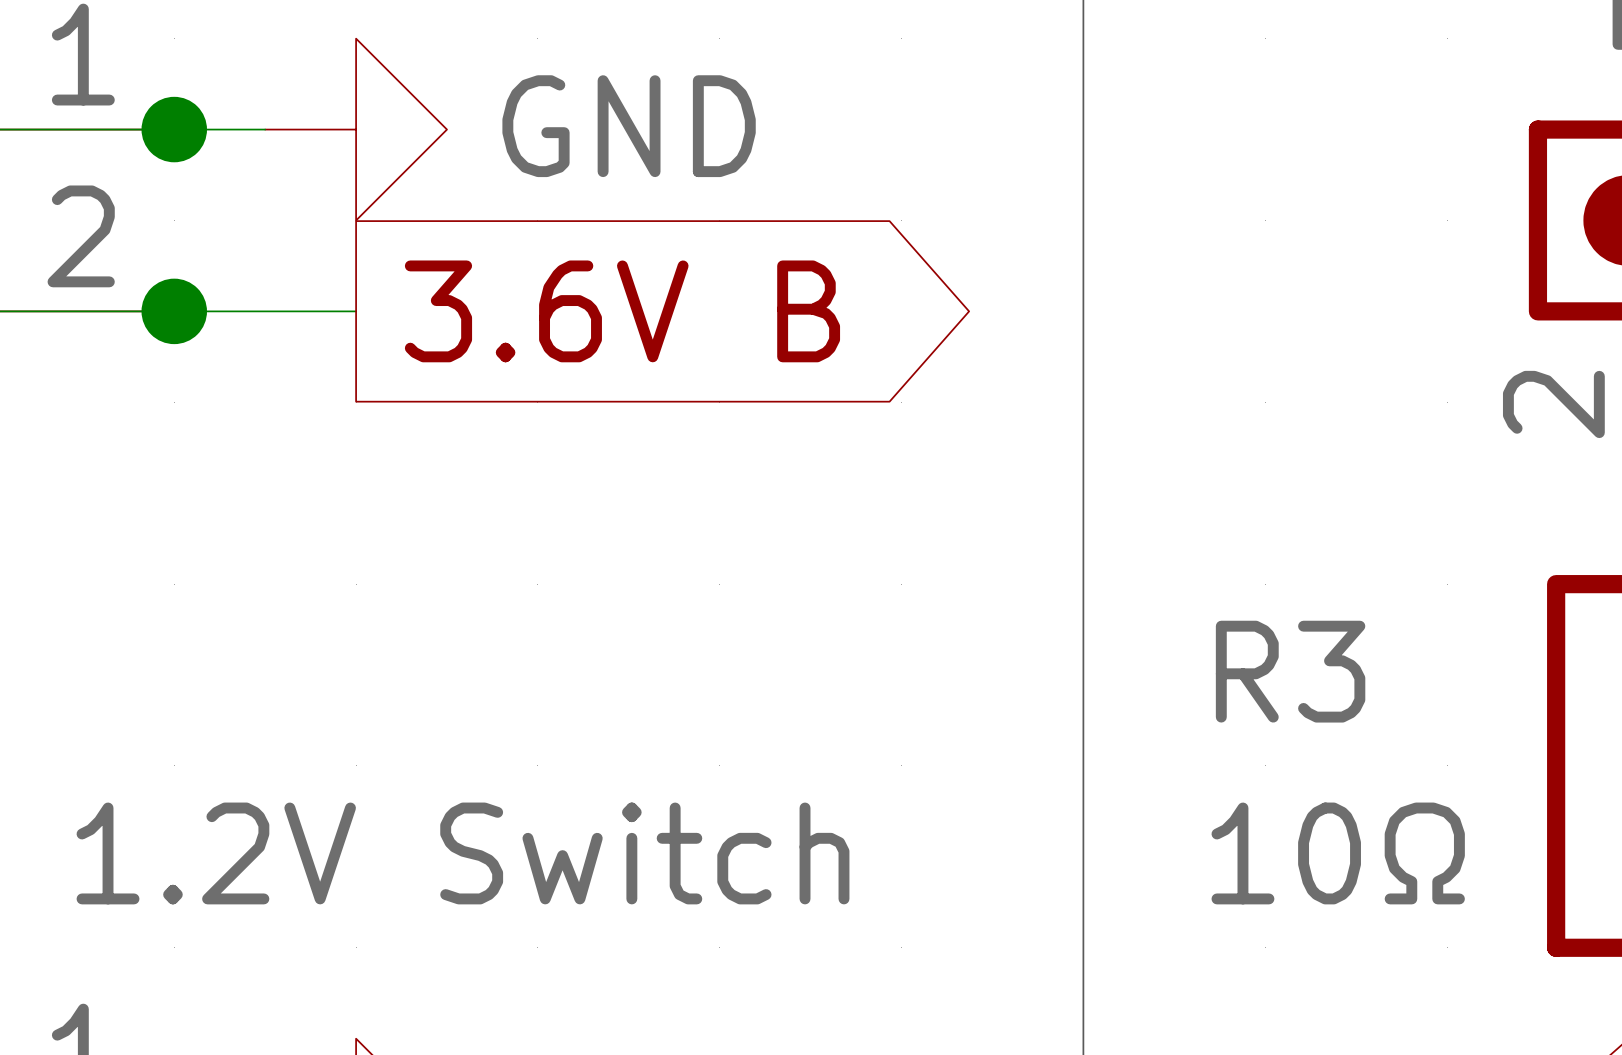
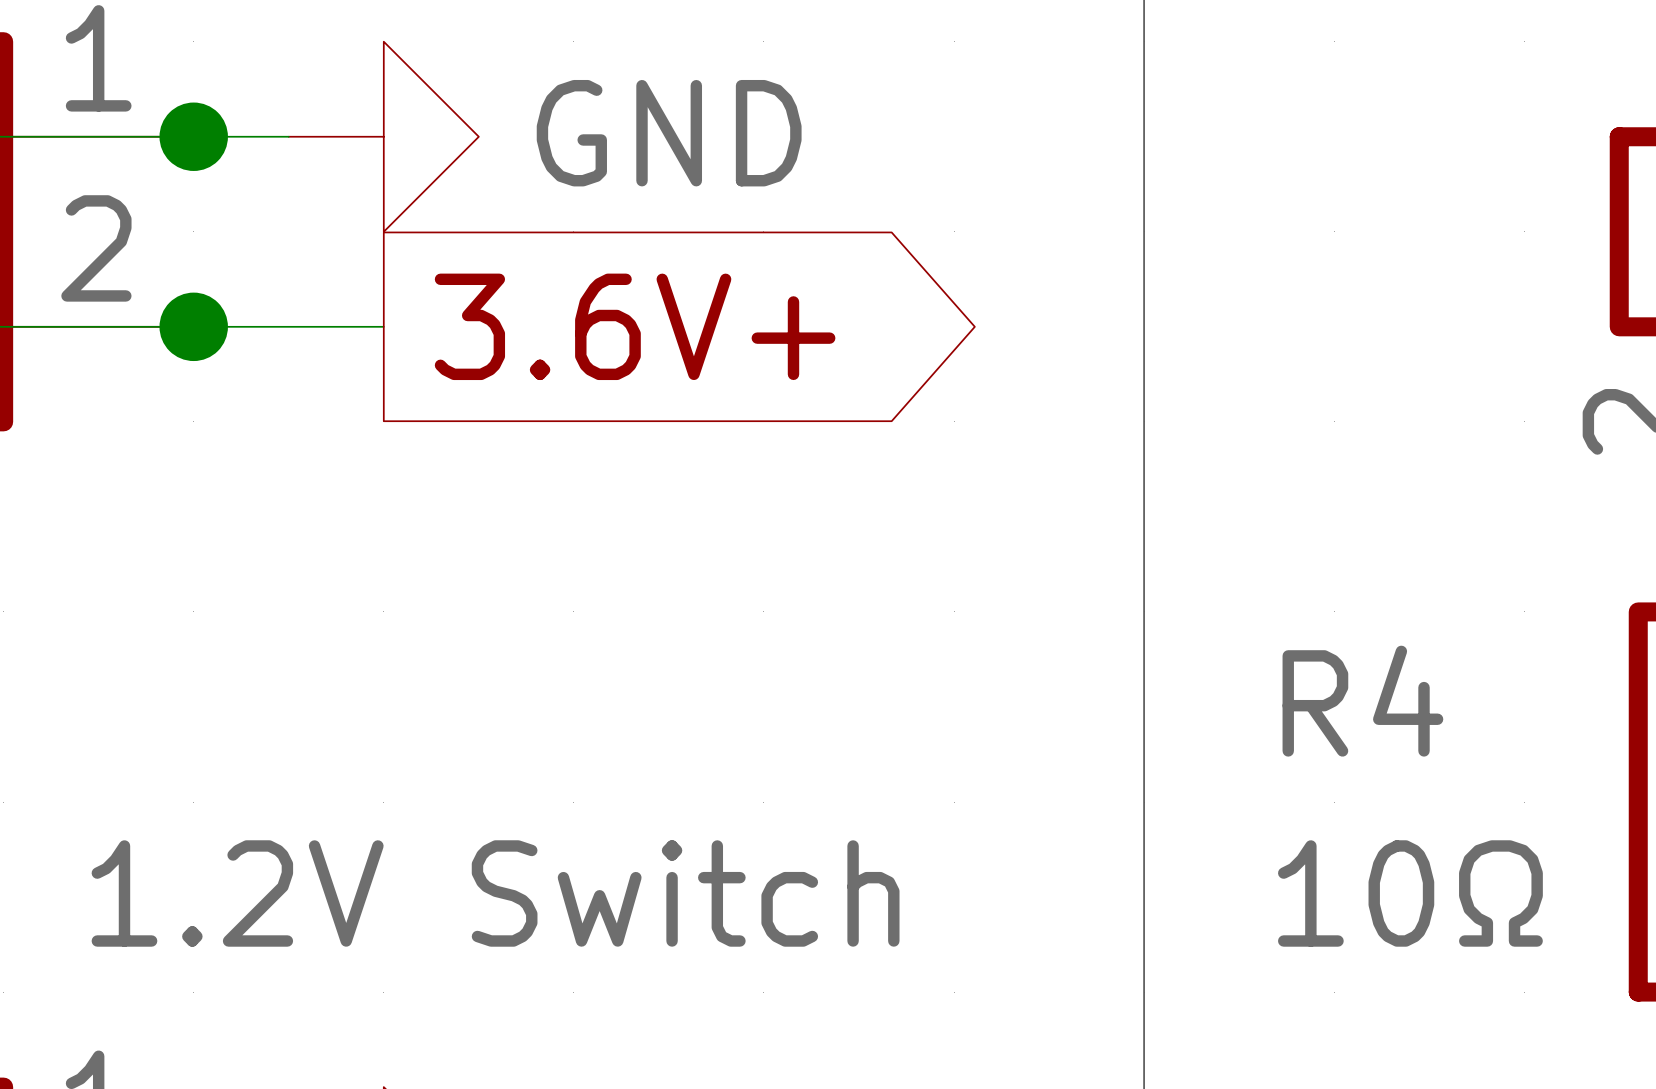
global label: 3.6V B (622, 311) -> 3.6V+ (635, 326)
R3 name: R3 (1290, 671) -> R4 (1362, 701)

